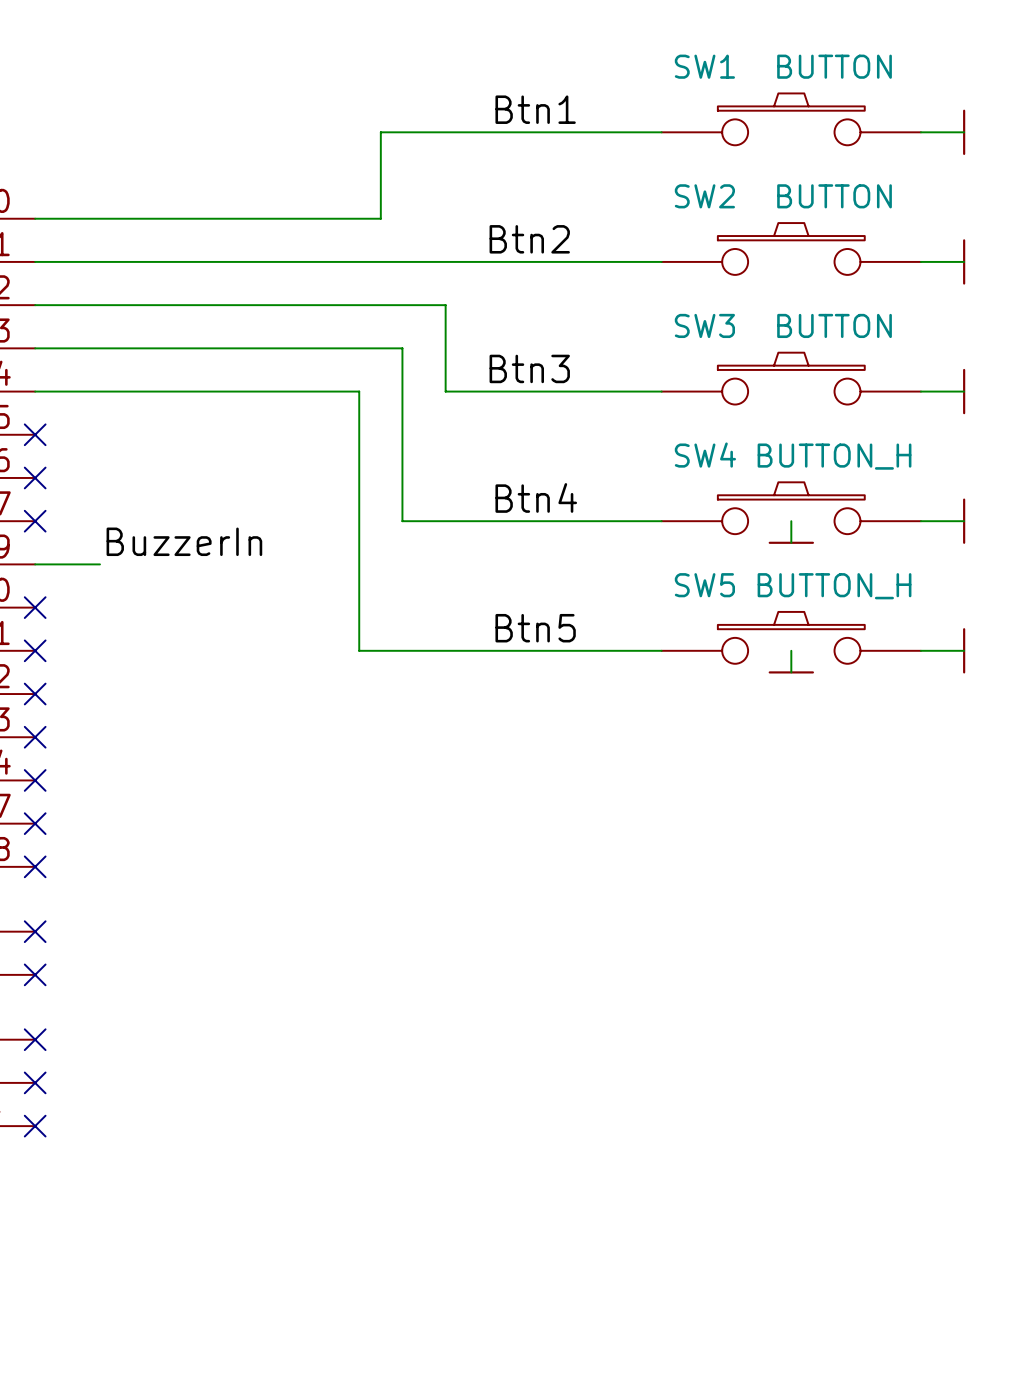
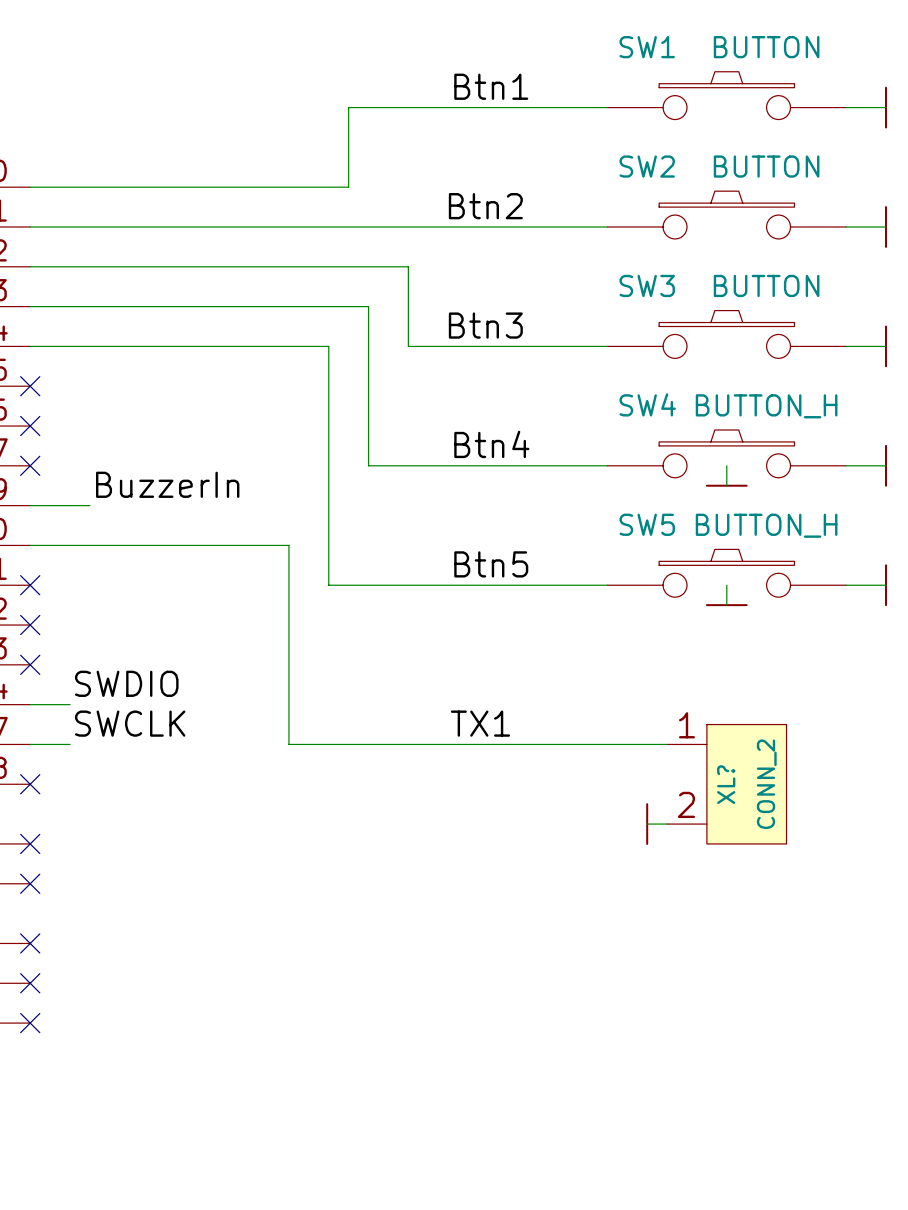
wire: none -> (30, 545) (288, 545) (288, 744) (667, 744)
no-connect mark: (35, 607) -> none
label: none -> SWDIO (126, 683)
wire: none -> (30, 704) (70, 704)
no-connect mark: (35, 780) -> none
label: none -> SWCLK (130, 723)
label: none -> TX1 (480, 723)
wire: none -> (30, 744) (70, 744)
no-connect mark: (35, 823) -> none
XL?: none -> CONN_2 (726, 784)
wire: none -> (647, 824) (667, 824)
power symbol: none -> (647, 824)

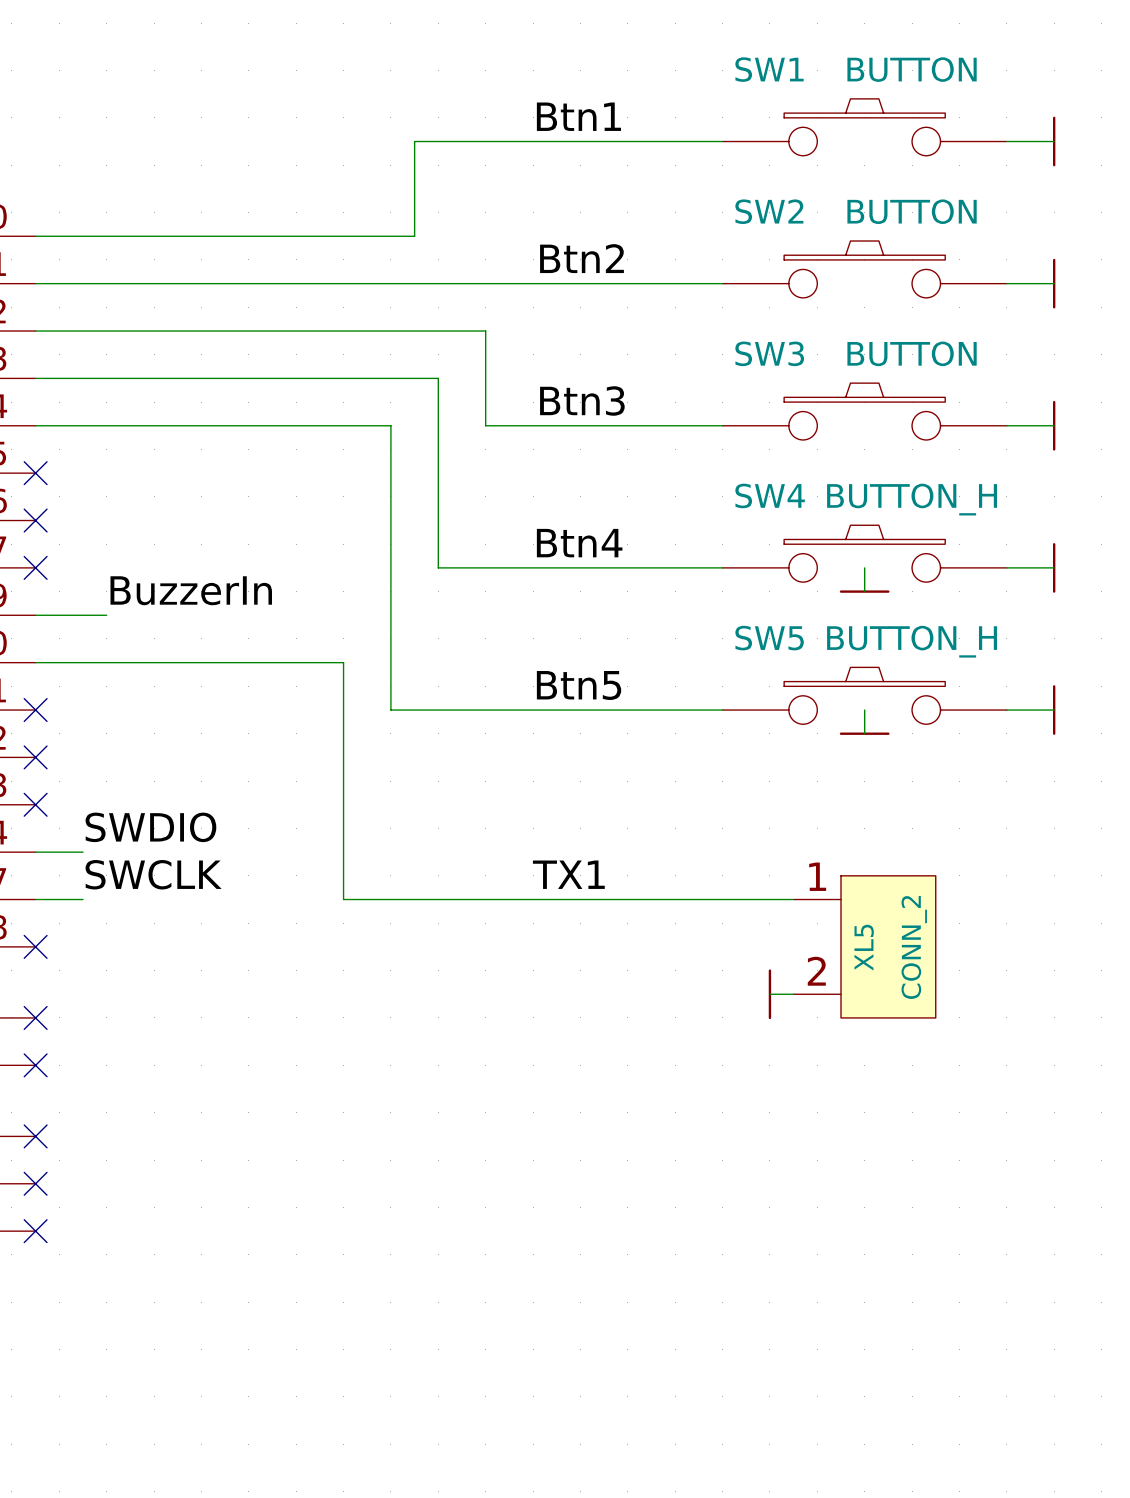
XL? name: XL? (726, 784) -> XL5 (864, 947)

